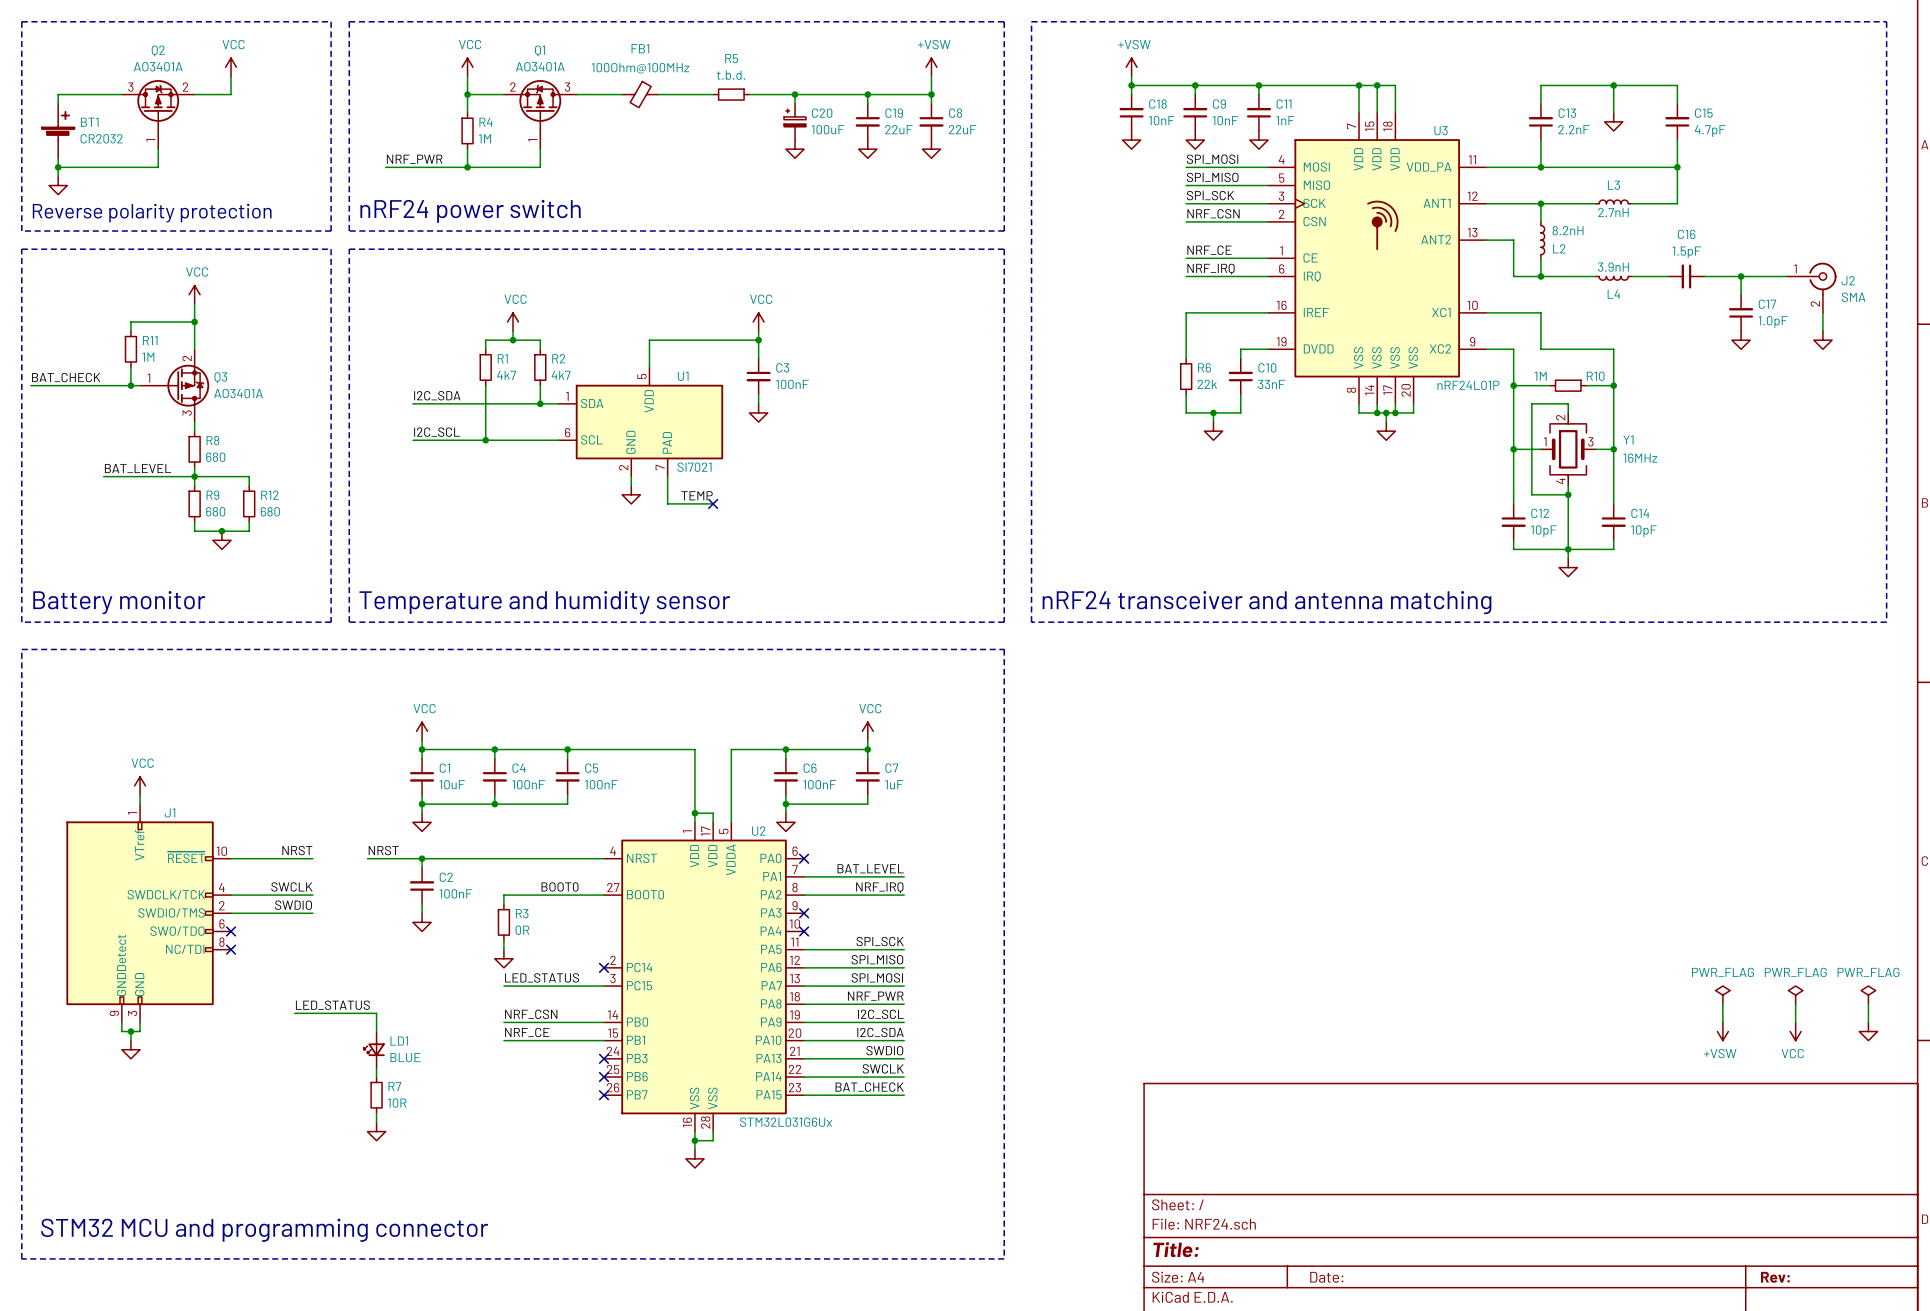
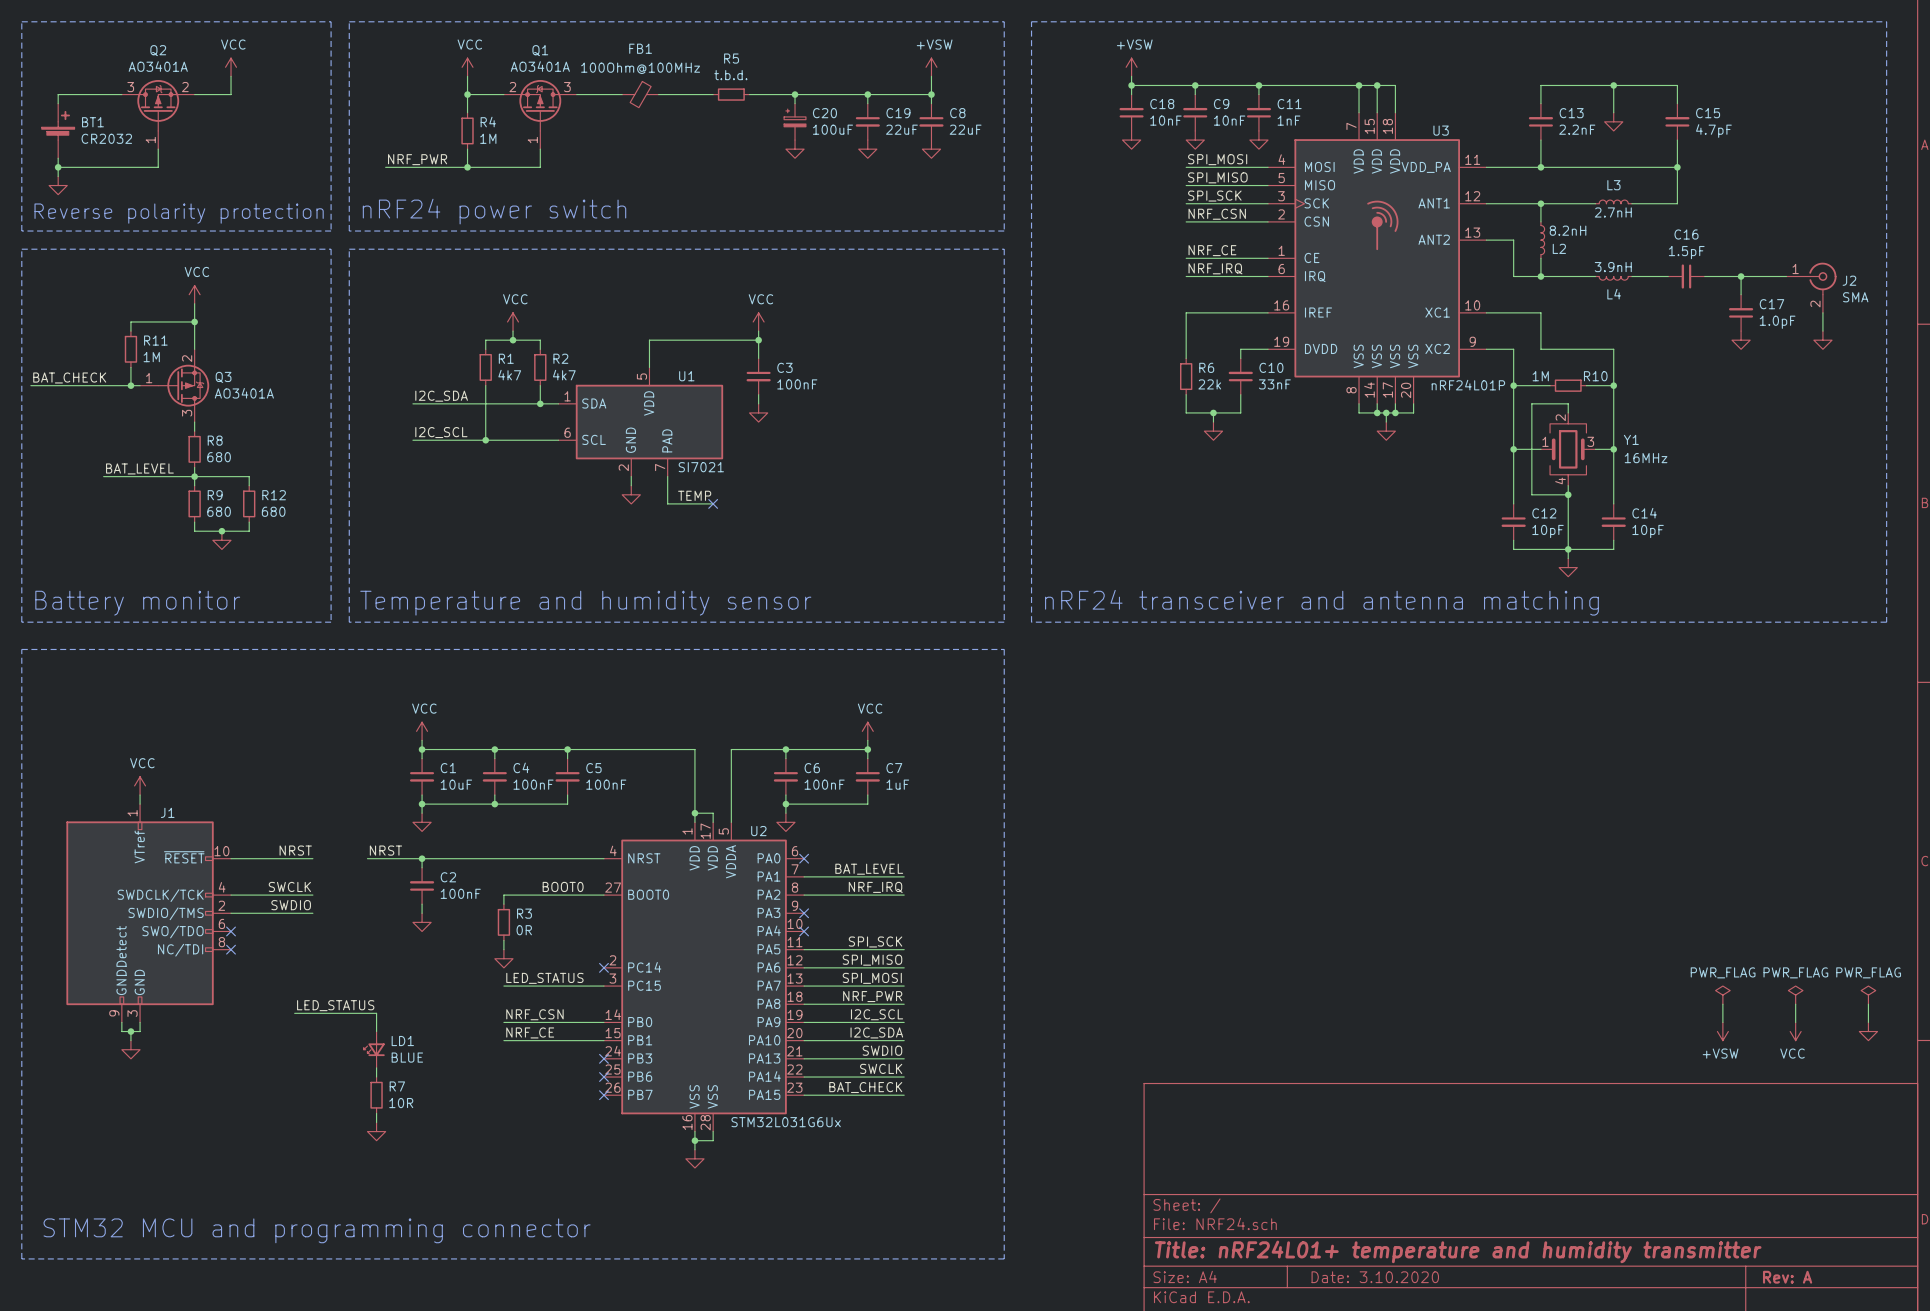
title block: Title: (1176, 1249) -> Title: nRF24L01+ temperature and humidity transmitter (1458, 1251)
title block: Date: (1326, 1277) -> Date: 3.10.2020 (1375, 1277)
title block: Rev: (1775, 1277) -> Rev: A (1787, 1277)

